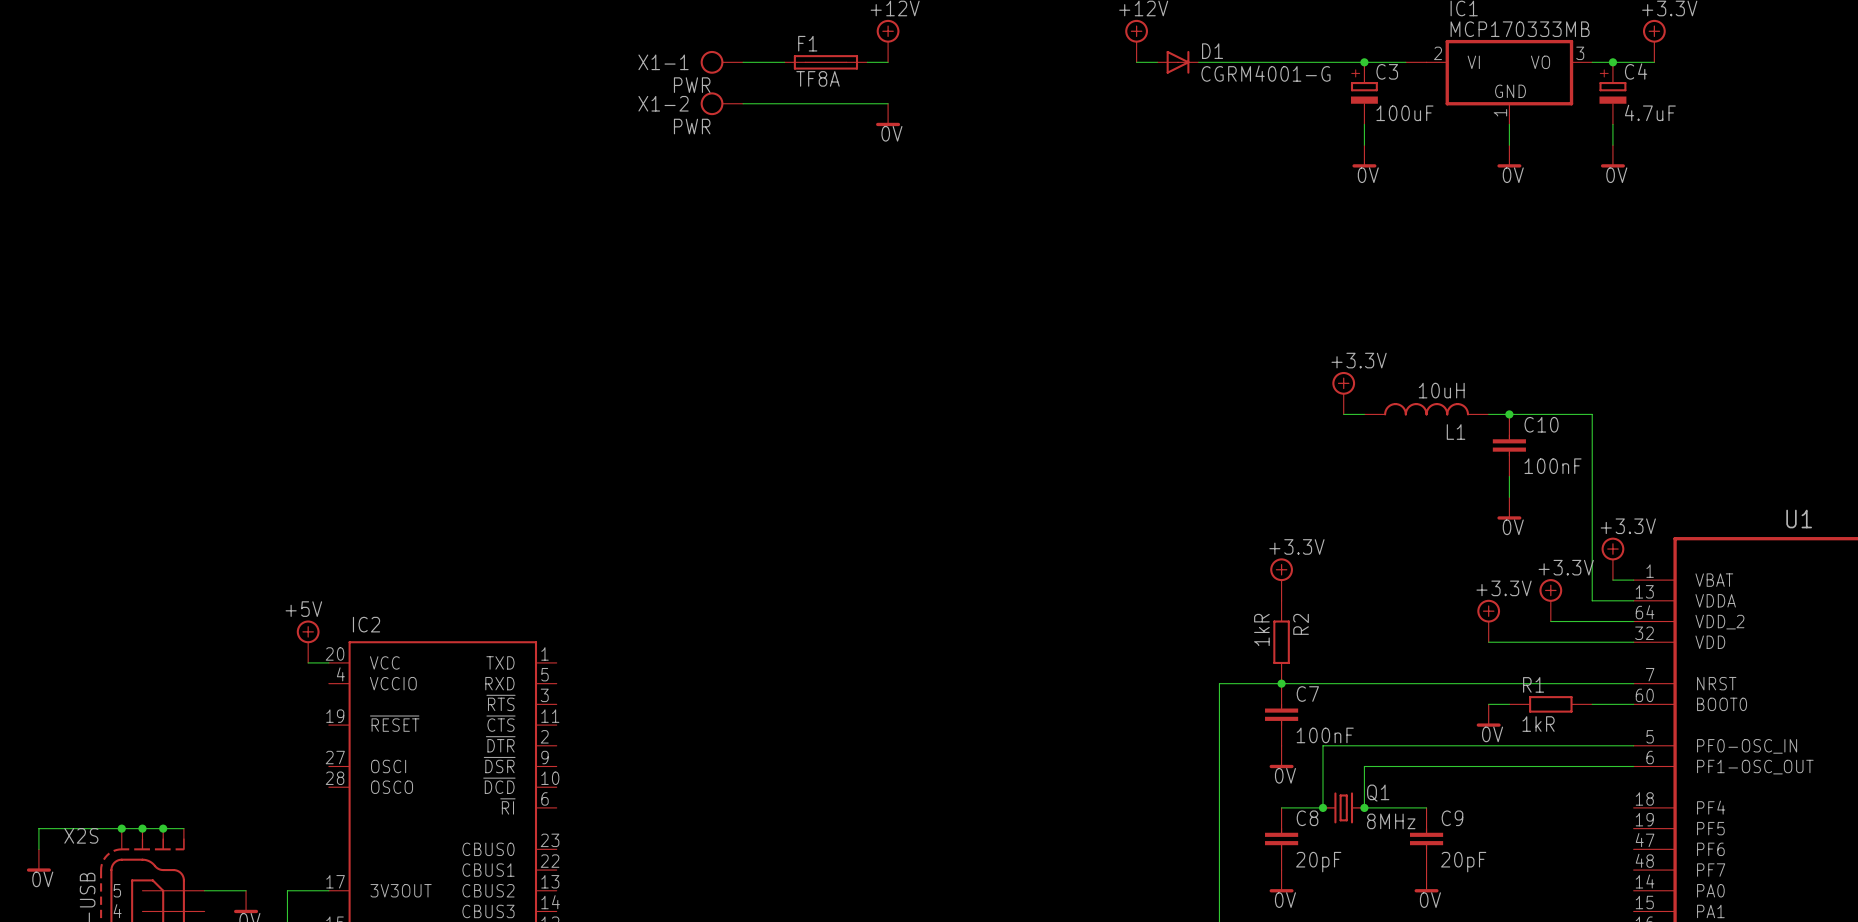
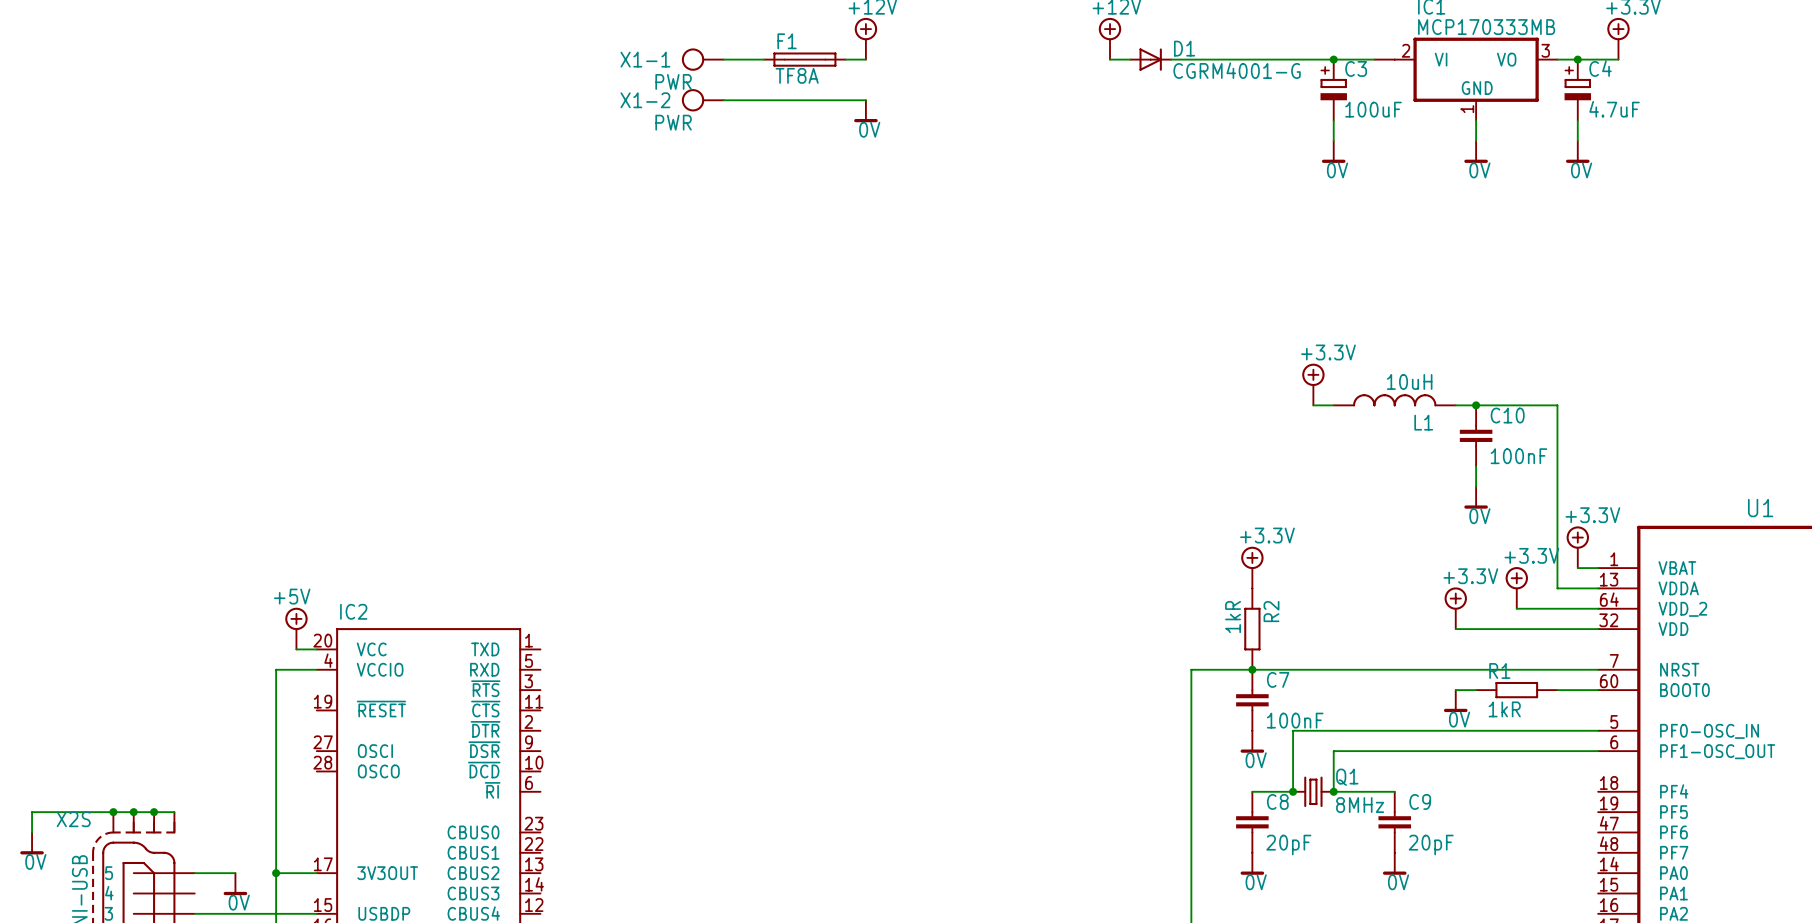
wire: none -> (316, 669) (276, 669) (276, 873)
junction: none -> (276, 873)

